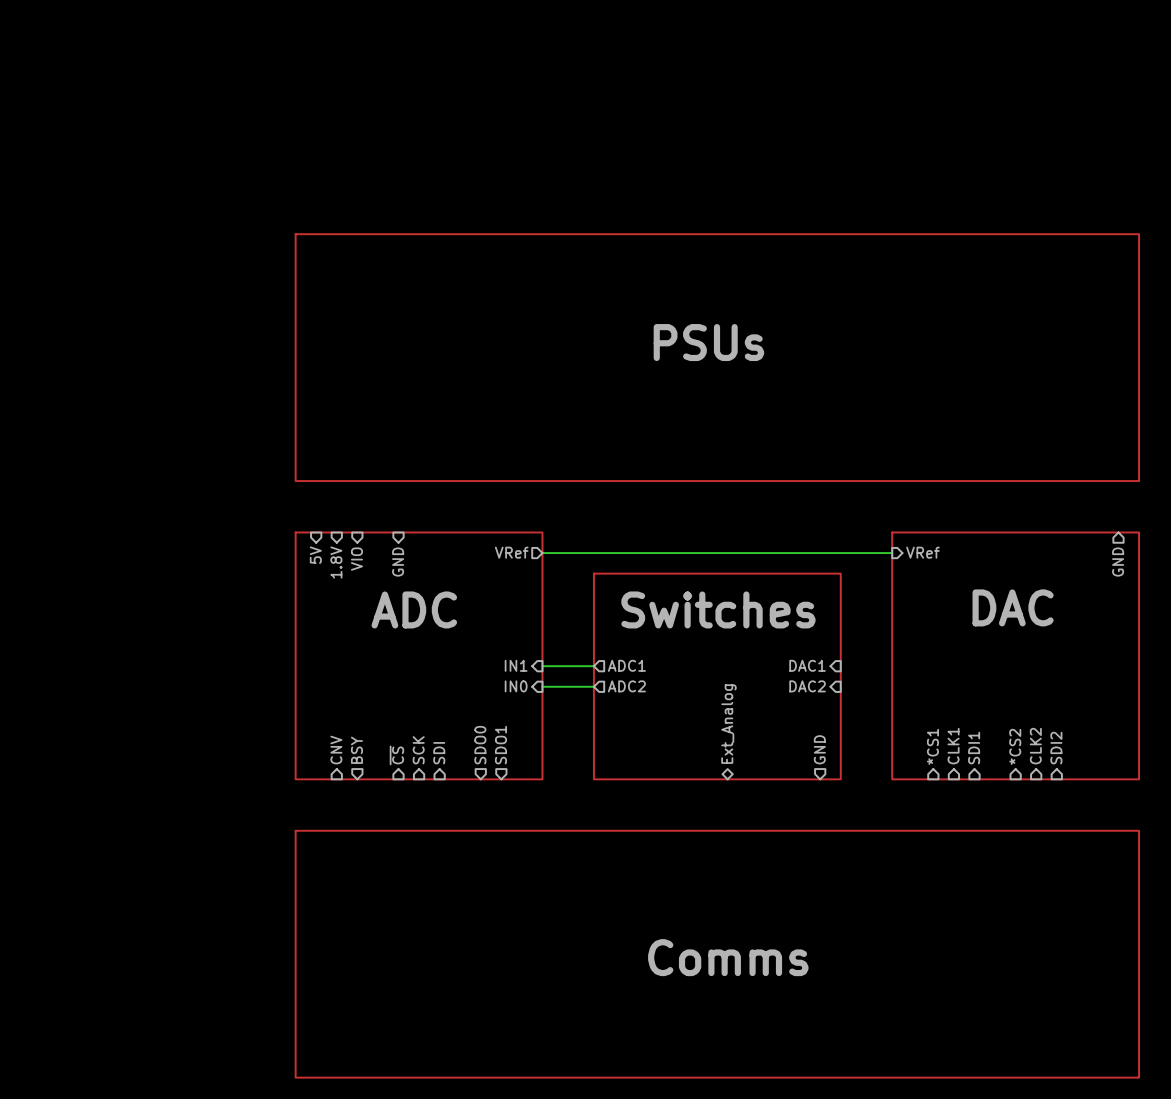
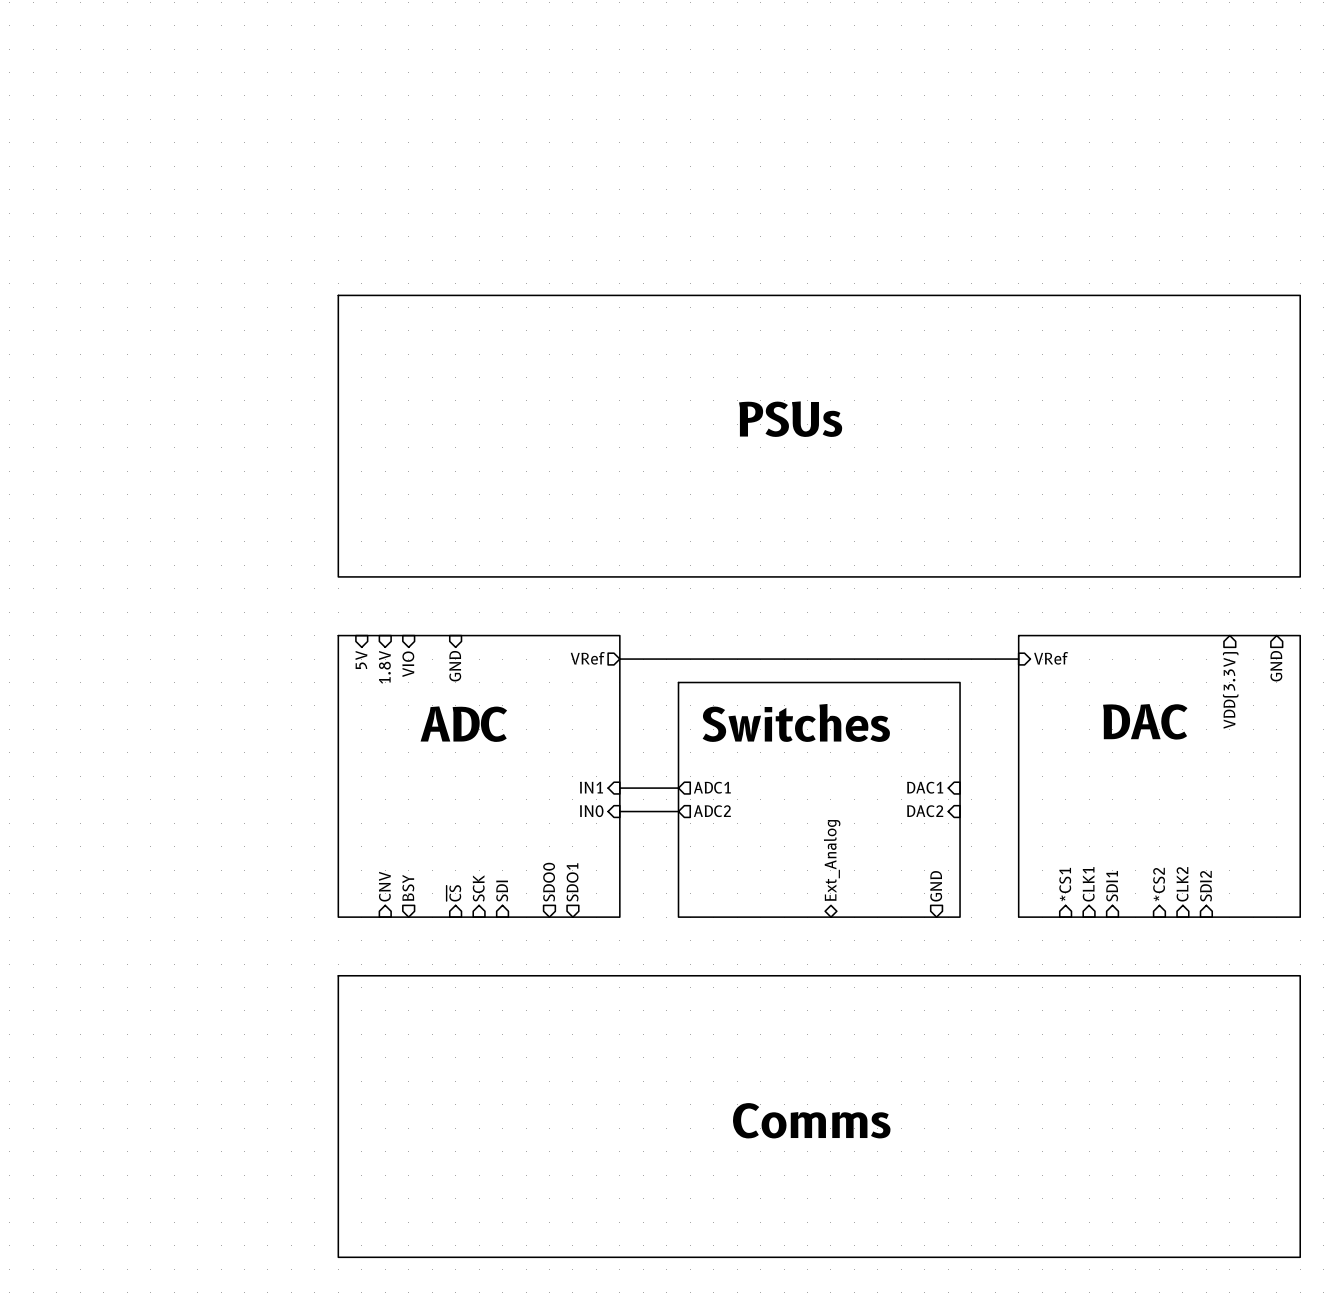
hierarchical label: none -> VDD(3.3V) (1230, 690)

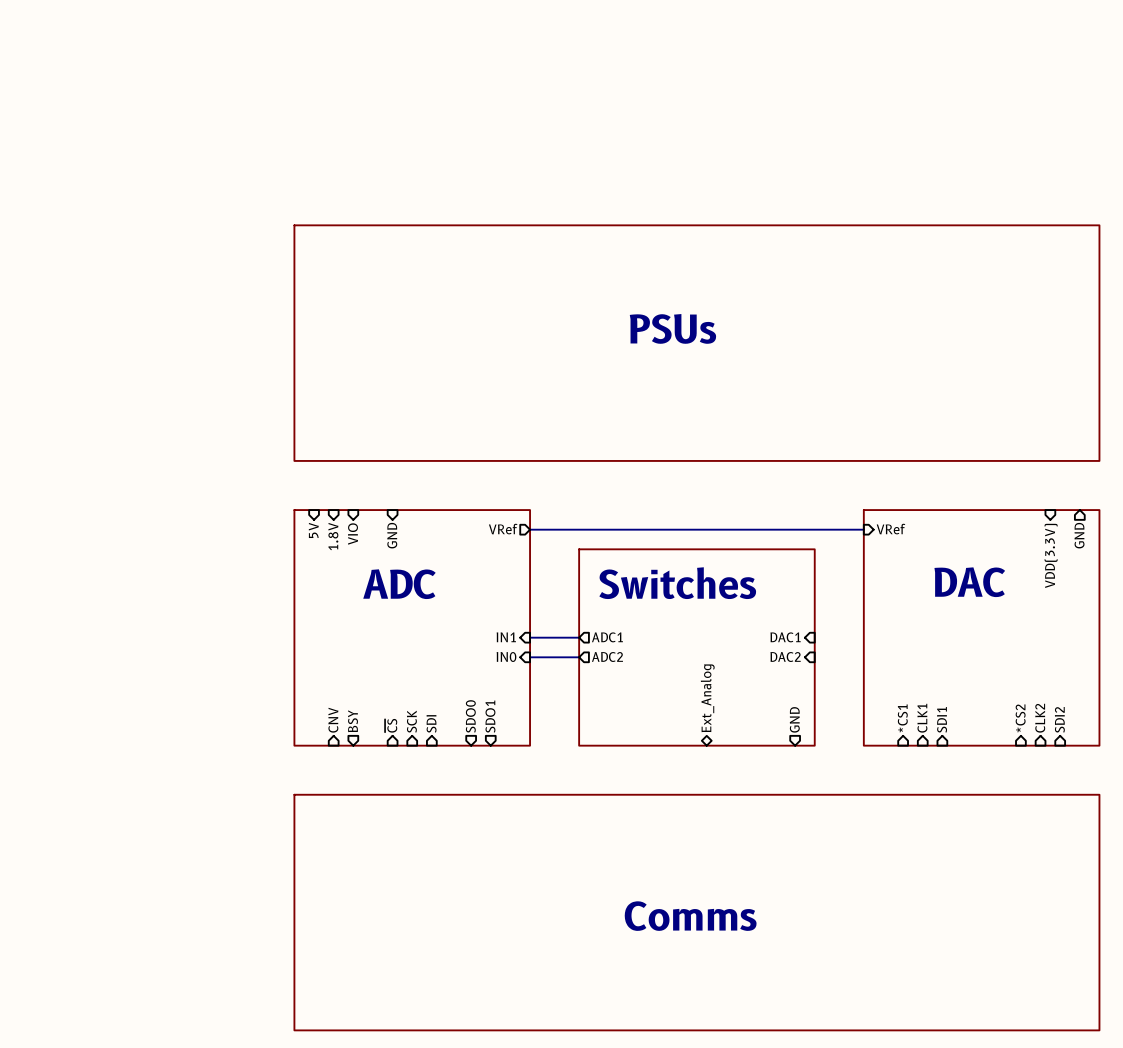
hierarchical label: VDD(3.3V) (1230, 690) -> none
sheet pin: none -> VDD(3.3V) (1051, 555)
sheet pin: *CS2 (1159, 884) -> none
sheet pin position: CLK2 (1182, 884) -> CLK2 (1040, 718)
sheet pin: SDI2 (1205, 886) -> *CS2 (1020, 718)
sheet pin: none -> SDI2 (1059, 719)

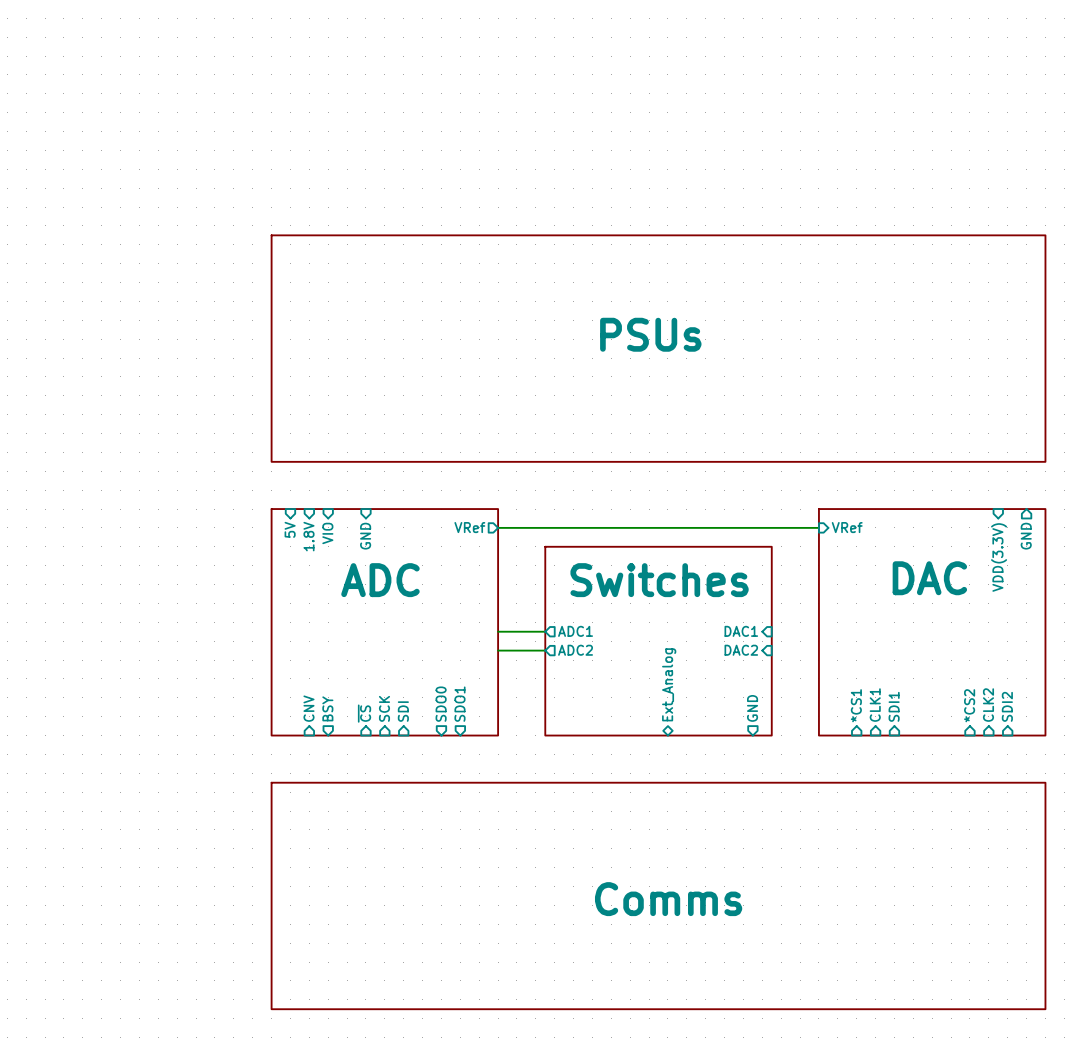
sheet pin: IN1 (506, 637) -> none
sheet pin: IN0 (506, 657) -> none

